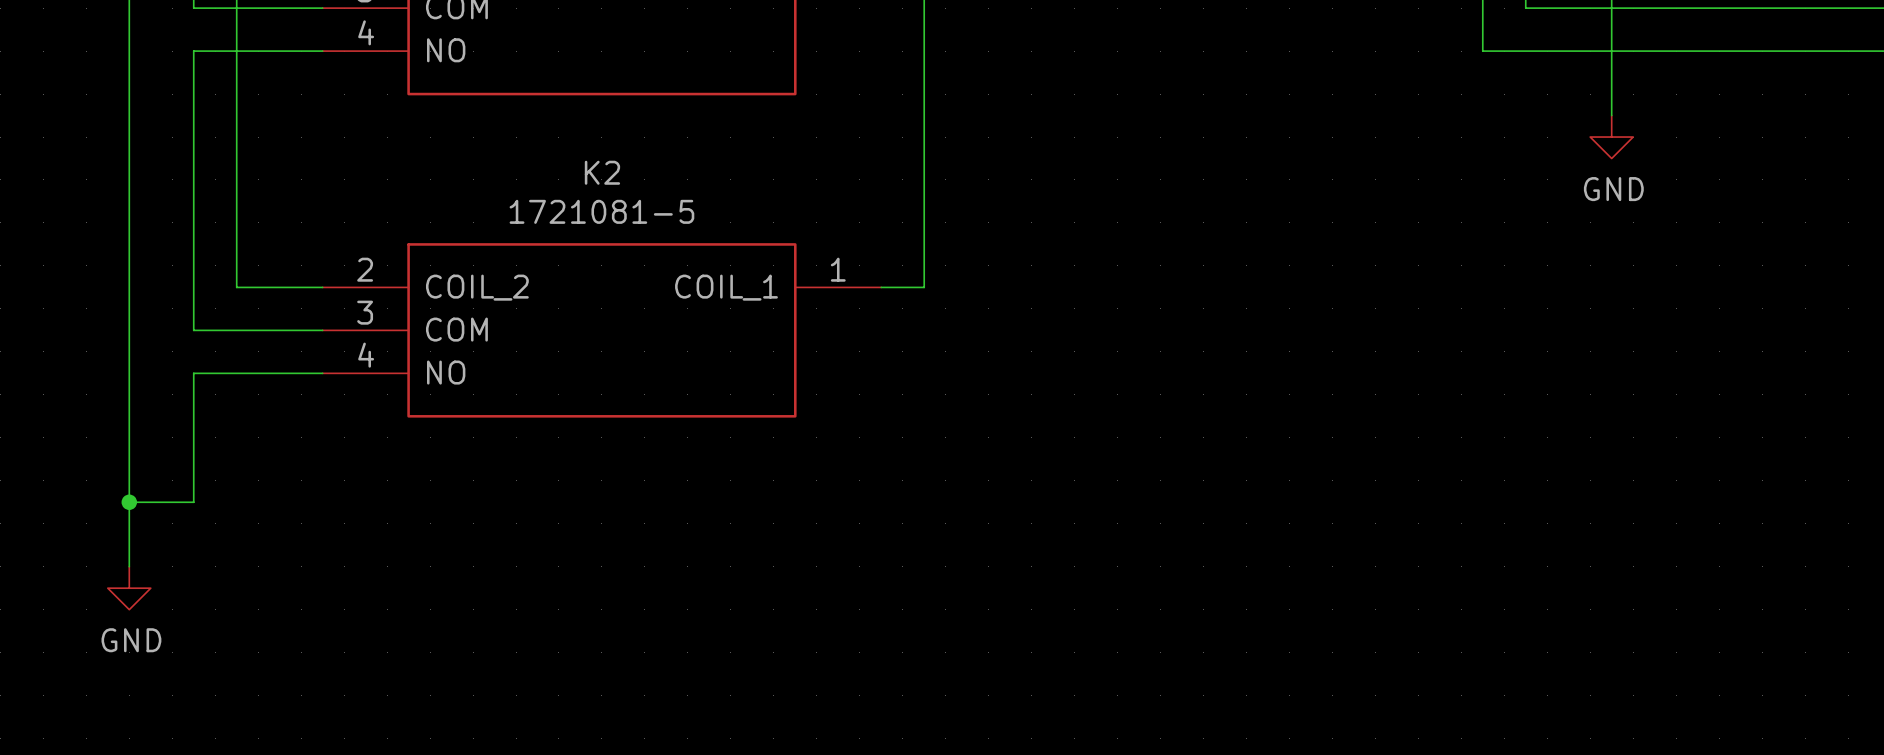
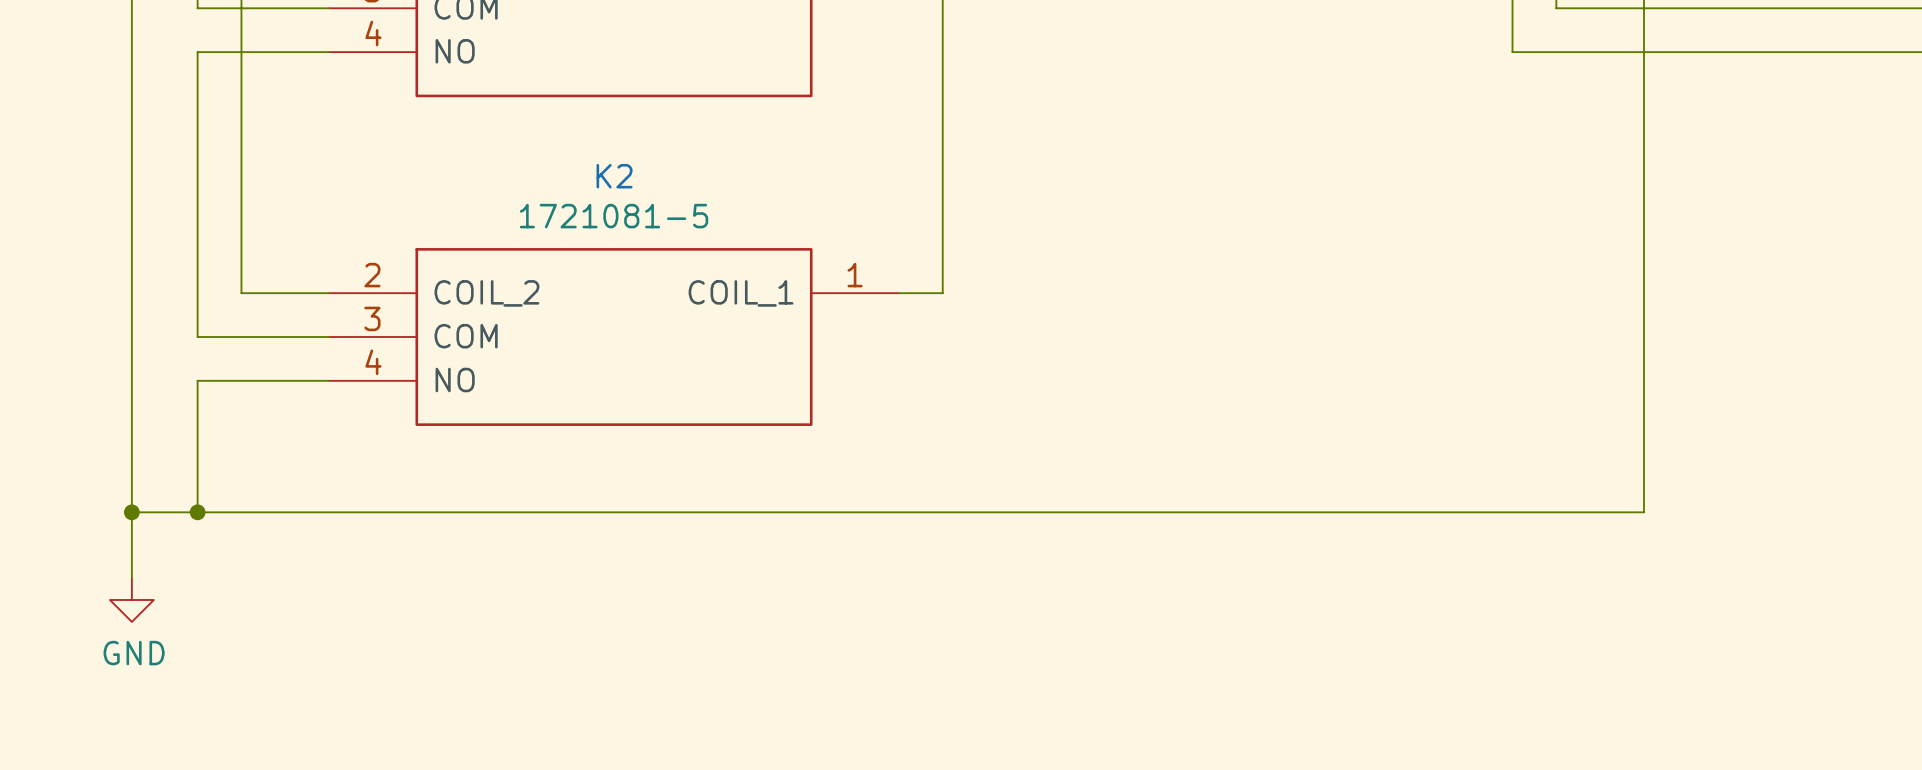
wire: none -> (1643, 117) (1643, 512) (197, 512)
power symbol: GND (1611, 137) -> none
junction: none -> (197, 512)

